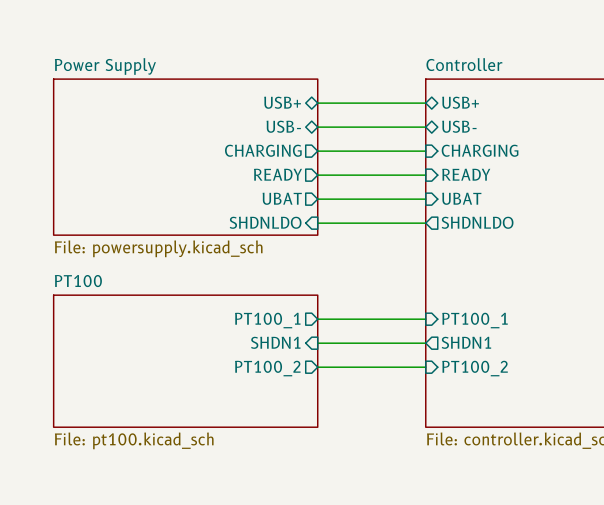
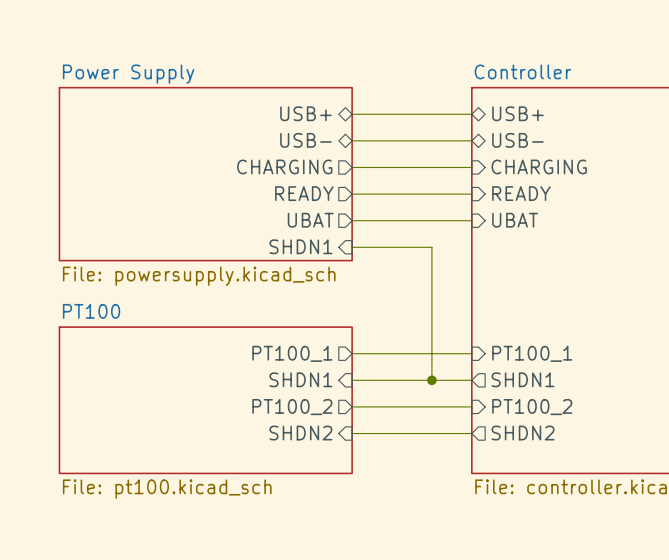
sheet pin: SHDNLDO (265, 222) -> SHDN1 (300, 246)
sheet pin: SHDNLDO (477, 222) -> none
wire: (389, 223) (425, 223) -> (431, 247) (431, 380)
junction: none -> (431, 380)
sheet pin: none -> SHDN2 (300, 433)
sheet pin: none -> SHDN2 (523, 433)
wire: none -> (352, 433) (471, 433)

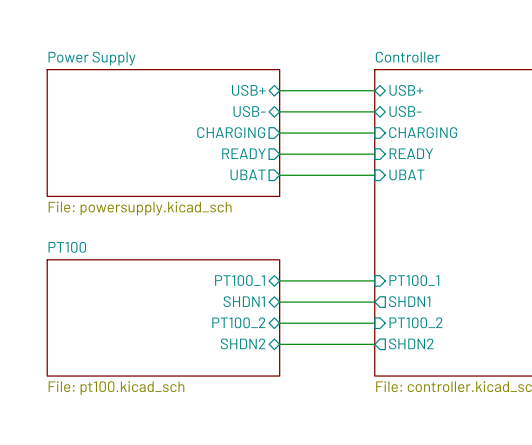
sheet Power Supply shape: [58, 86, 353, 262] -> [46, 68, 281, 198]
sheet pin: SHDN1 (300, 246) -> none
wire: (352, 247) (431, 247) (431, 380) -> none
sheet pin shape: output (292, 353) -> bidirectional (239, 280)
sheet pin shape: input (300, 379) -> bidirectional (244, 301)
junction: (431, 380) -> none
sheet pin shape: output (292, 407) -> bidirectional (238, 322)
sheet pin shape: input (300, 433) -> bidirectional (243, 343)

